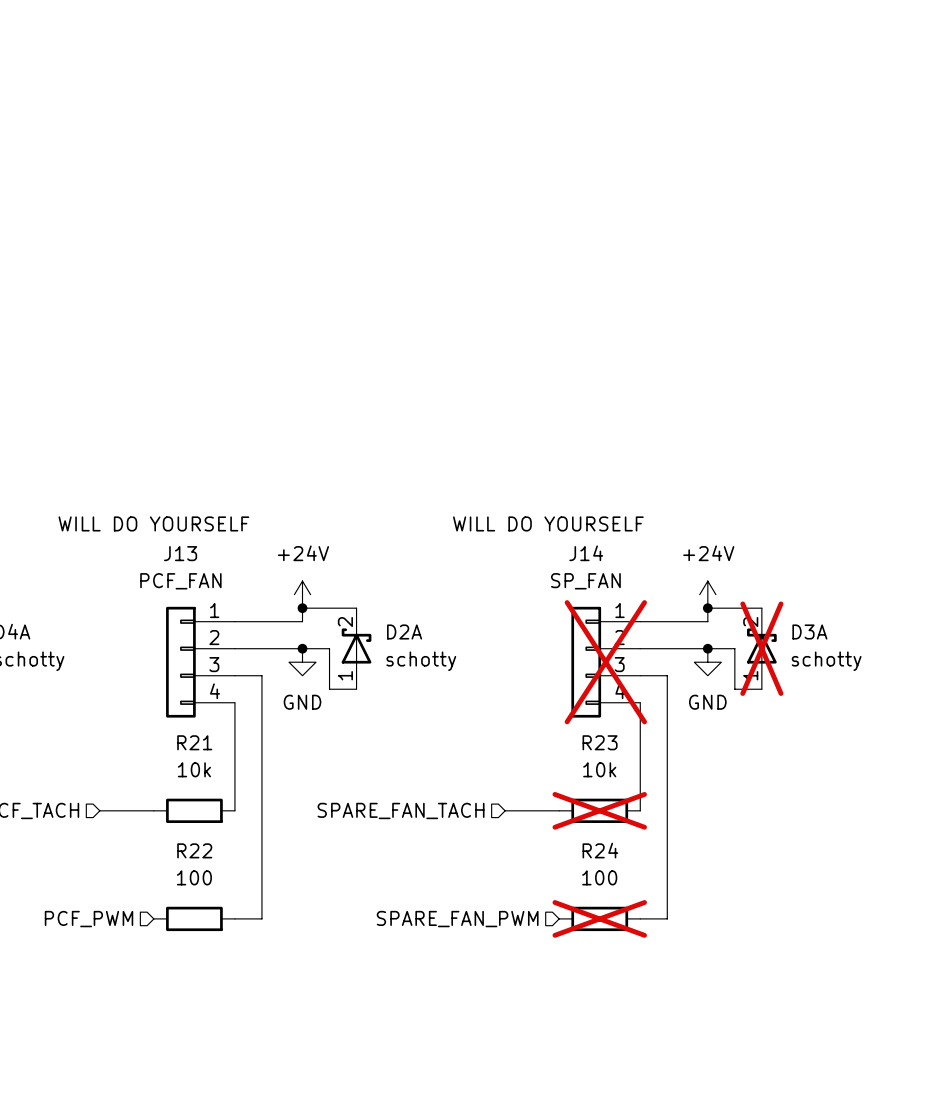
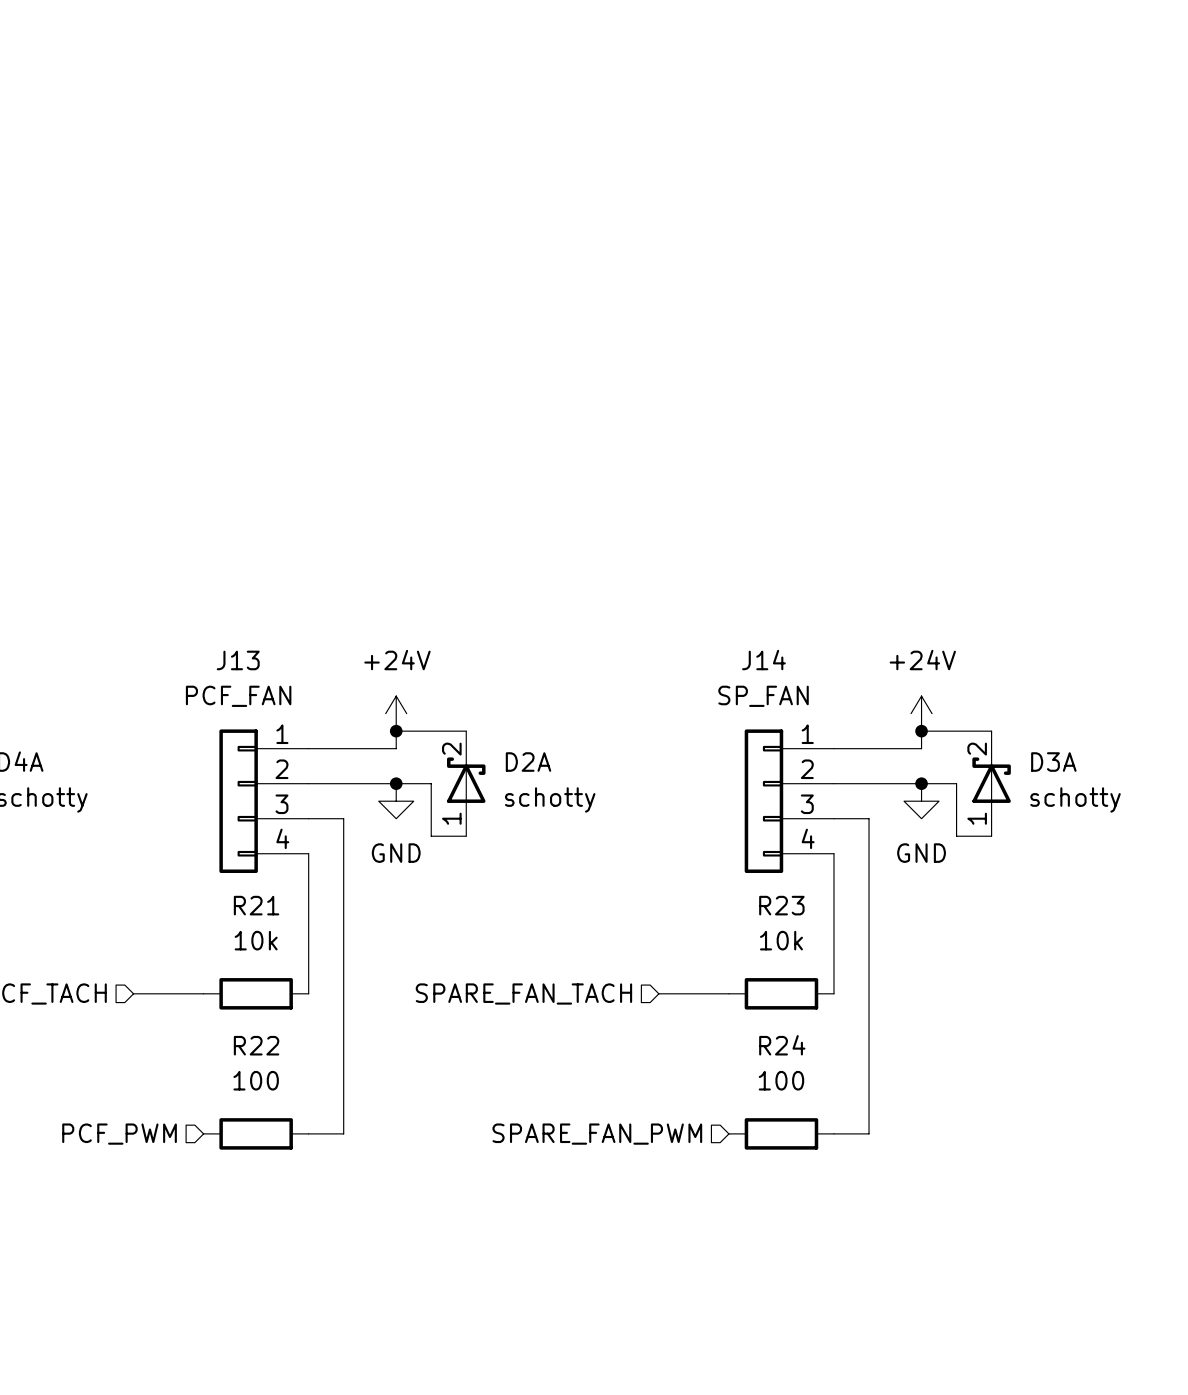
text: WILL DO YOURSELF (153, 523) -> none
text: WILL DO YOURSELF (548, 523) -> none
D3A do-not-place cross: (761, 648) -> none
J14 do-not-place cross: (605, 662) -> none
R23 do-not-place cross: (599, 810) -> none
R24 do-not-place cross: (599, 918) -> none

